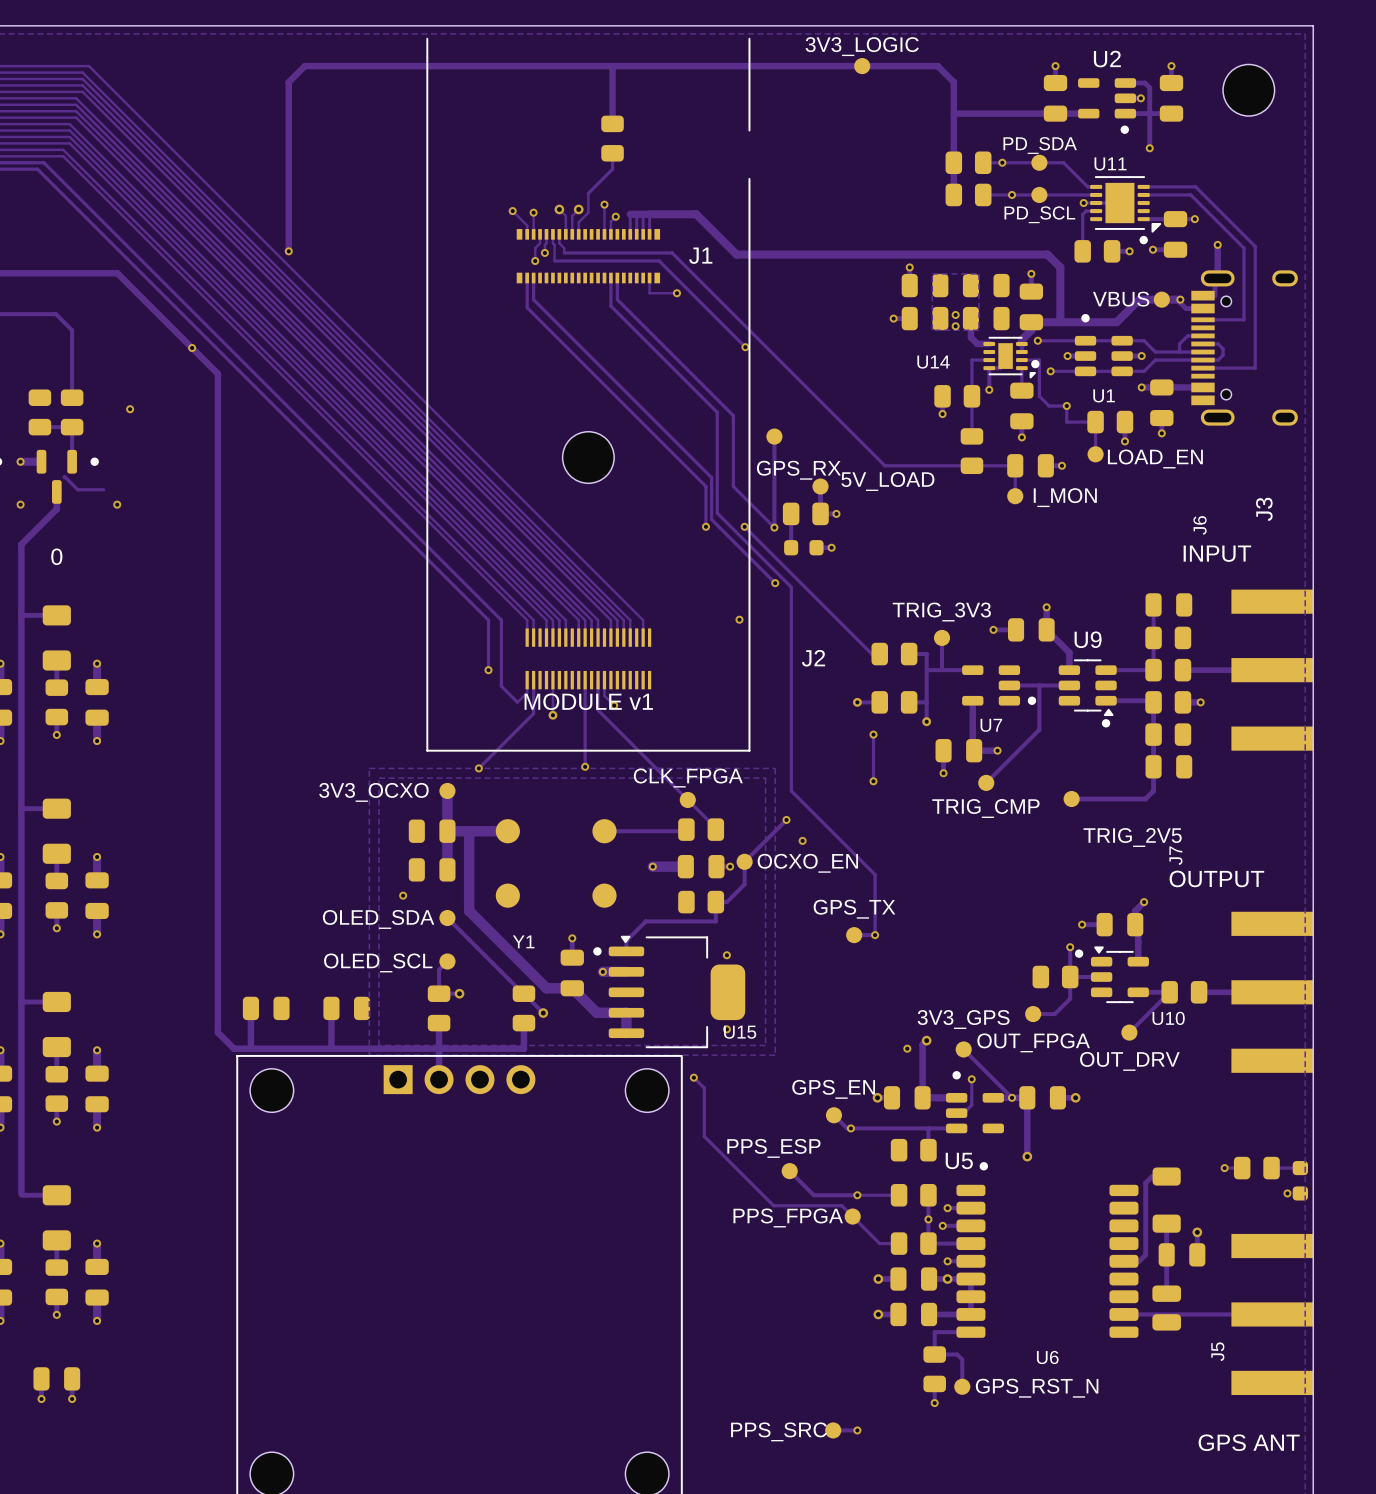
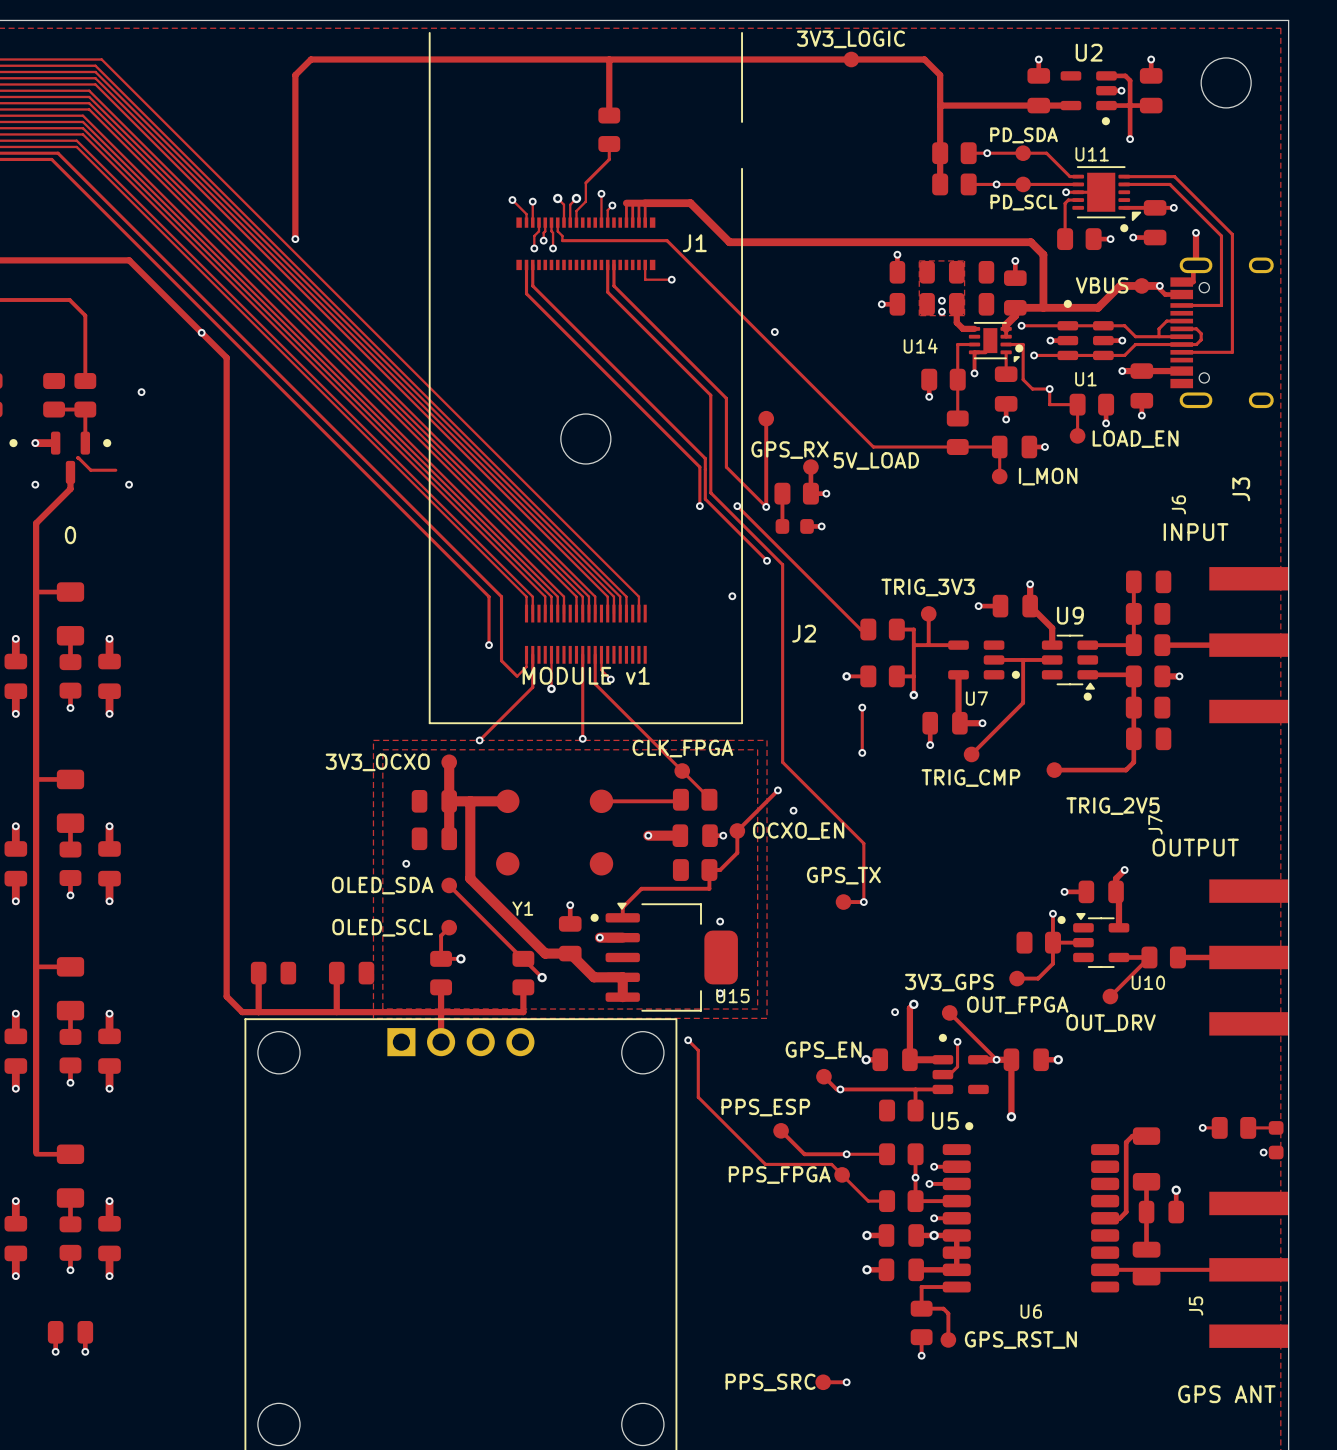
track: (554, 261) (659, 261) (745, 347) -> none
via: none -> (553, 248)
via position: (745, 347) -> (774, 332)

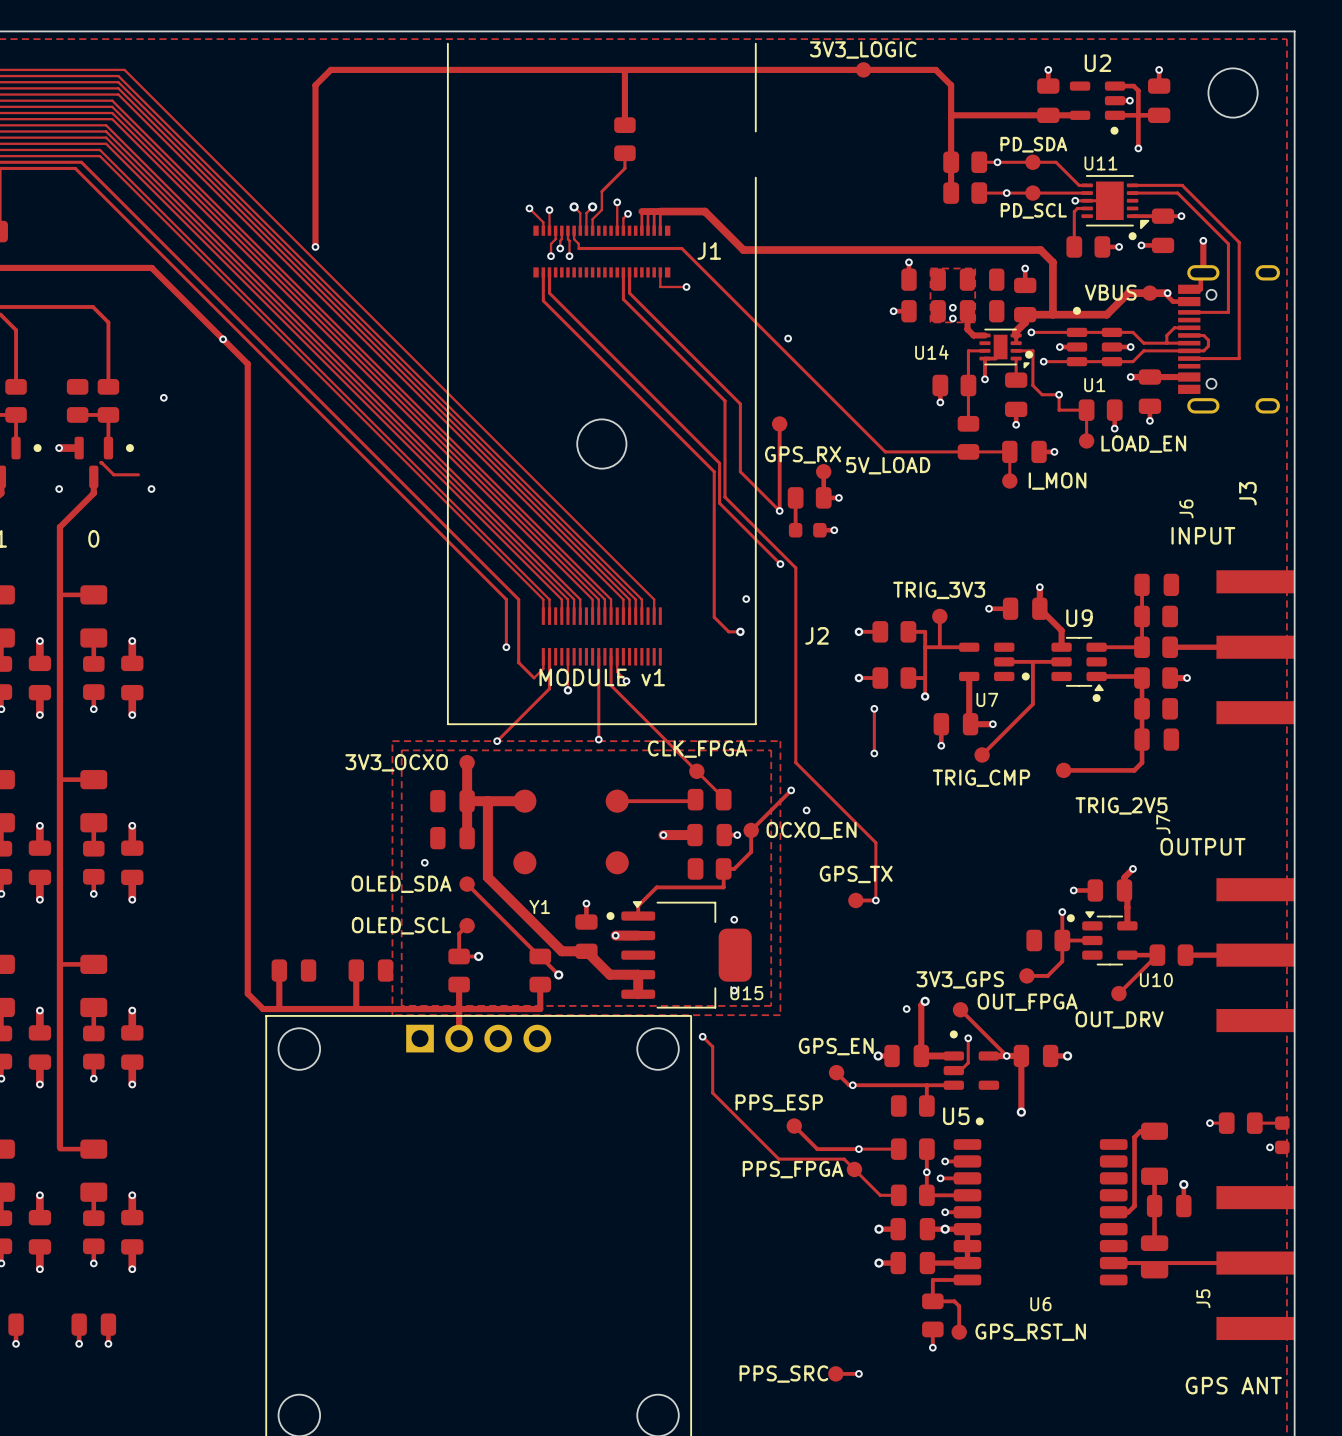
track: none -> (714, 510) (714, 617) (728, 631) (740, 631)
via: (699, 506) -> none
track: (737, 506) (860, 629) -> (858, 631) (872, 631)
via: (737, 506) -> none
via: none -> (740, 631)
via: none -> (858, 631)

